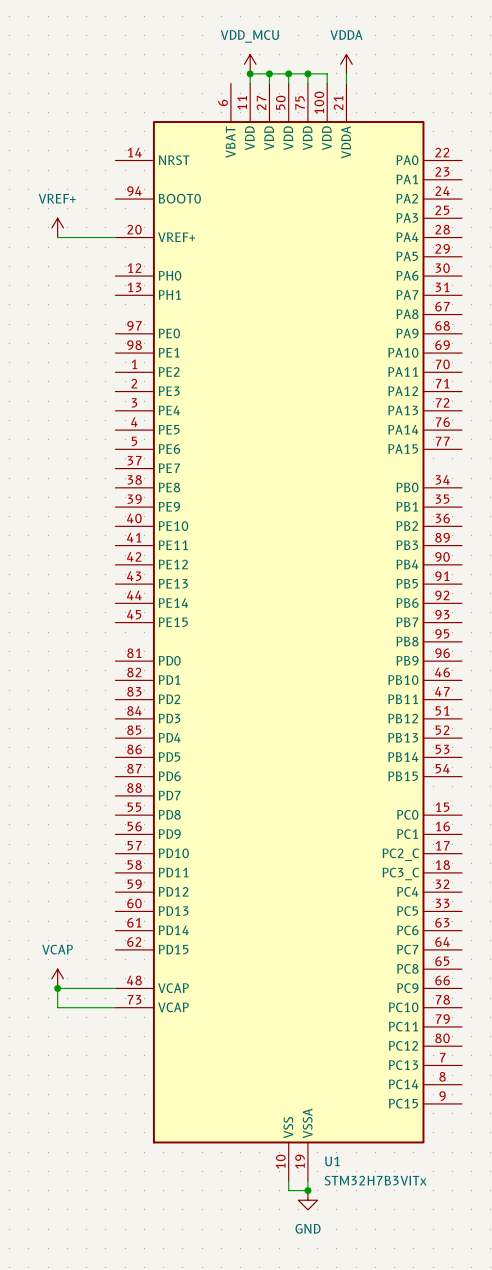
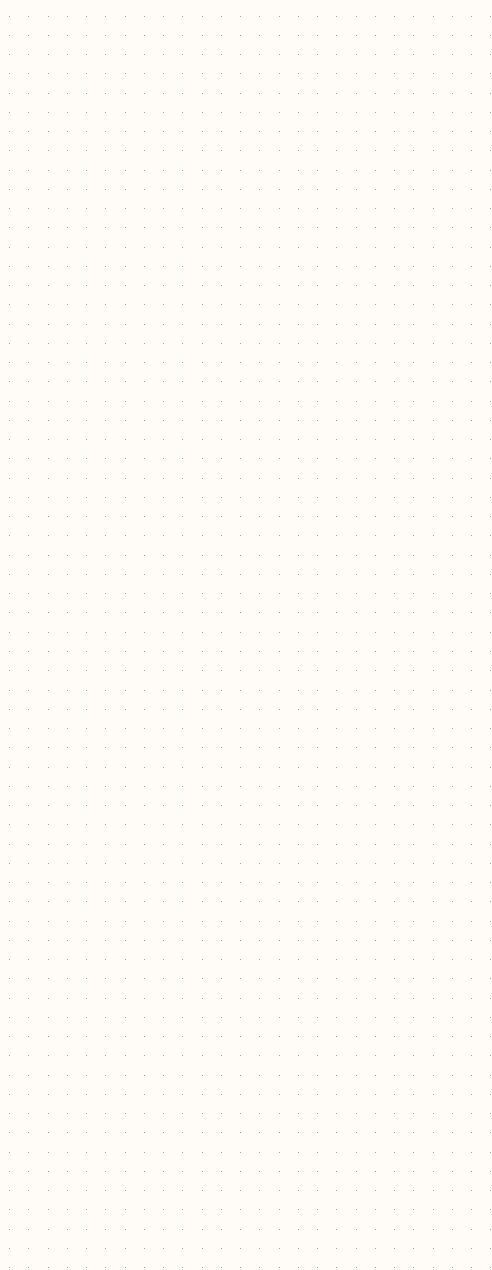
power symbol: VDD_MCU (250, 64) -> none
power symbol: VDDA (346, 64) -> none
junction: (250, 73) -> none
wire: (269, 73) (269, 83) -> none
junction: (269, 73) -> none
wire: (288, 73) (288, 83) -> none
junction: (288, 73) -> none
wire: (307, 73) (307, 83) -> none
junction: (307, 73) -> none
wire: (346, 73) (346, 83) -> none
wire: (250, 83) (250, 73) (327, 73) (327, 83) -> none
power symbol: VREF+ (57, 227) -> none
wire: (57, 237) (115, 237) -> none
U1: STM32H7B3VITx (288, 632) -> none
power symbol: VCAP (57, 978) -> none
junction: (57, 988) -> none
wire: (115, 988) (57, 988) (57, 1007) (115, 1007) -> none
wire: (288, 1180) (288, 1190) (307, 1190) (307, 1180) -> none
junction: (307, 1190) -> none
power symbol: GND (307, 1200) -> none

